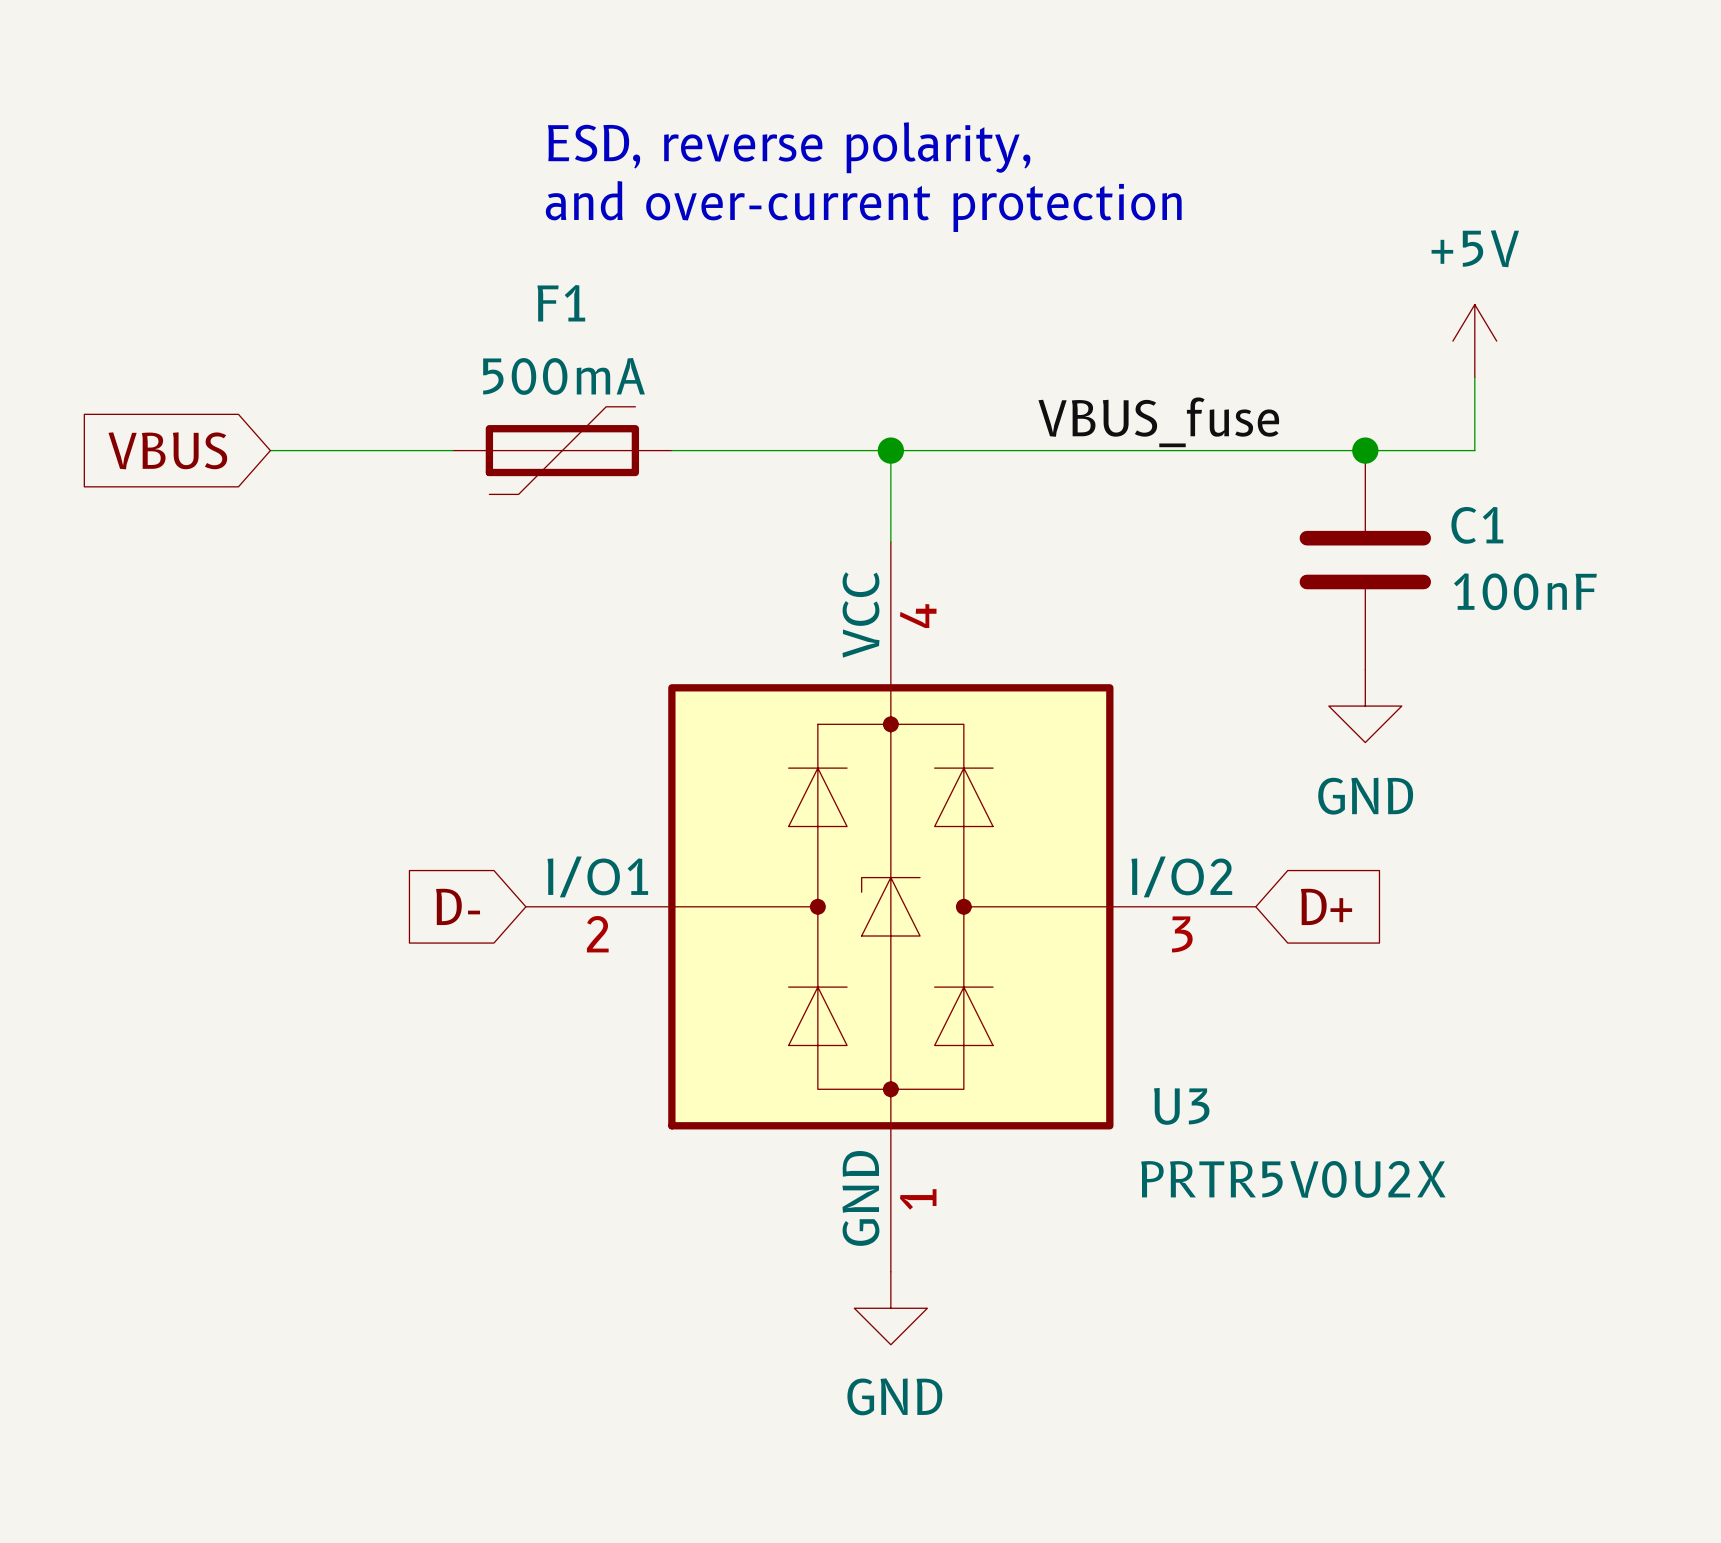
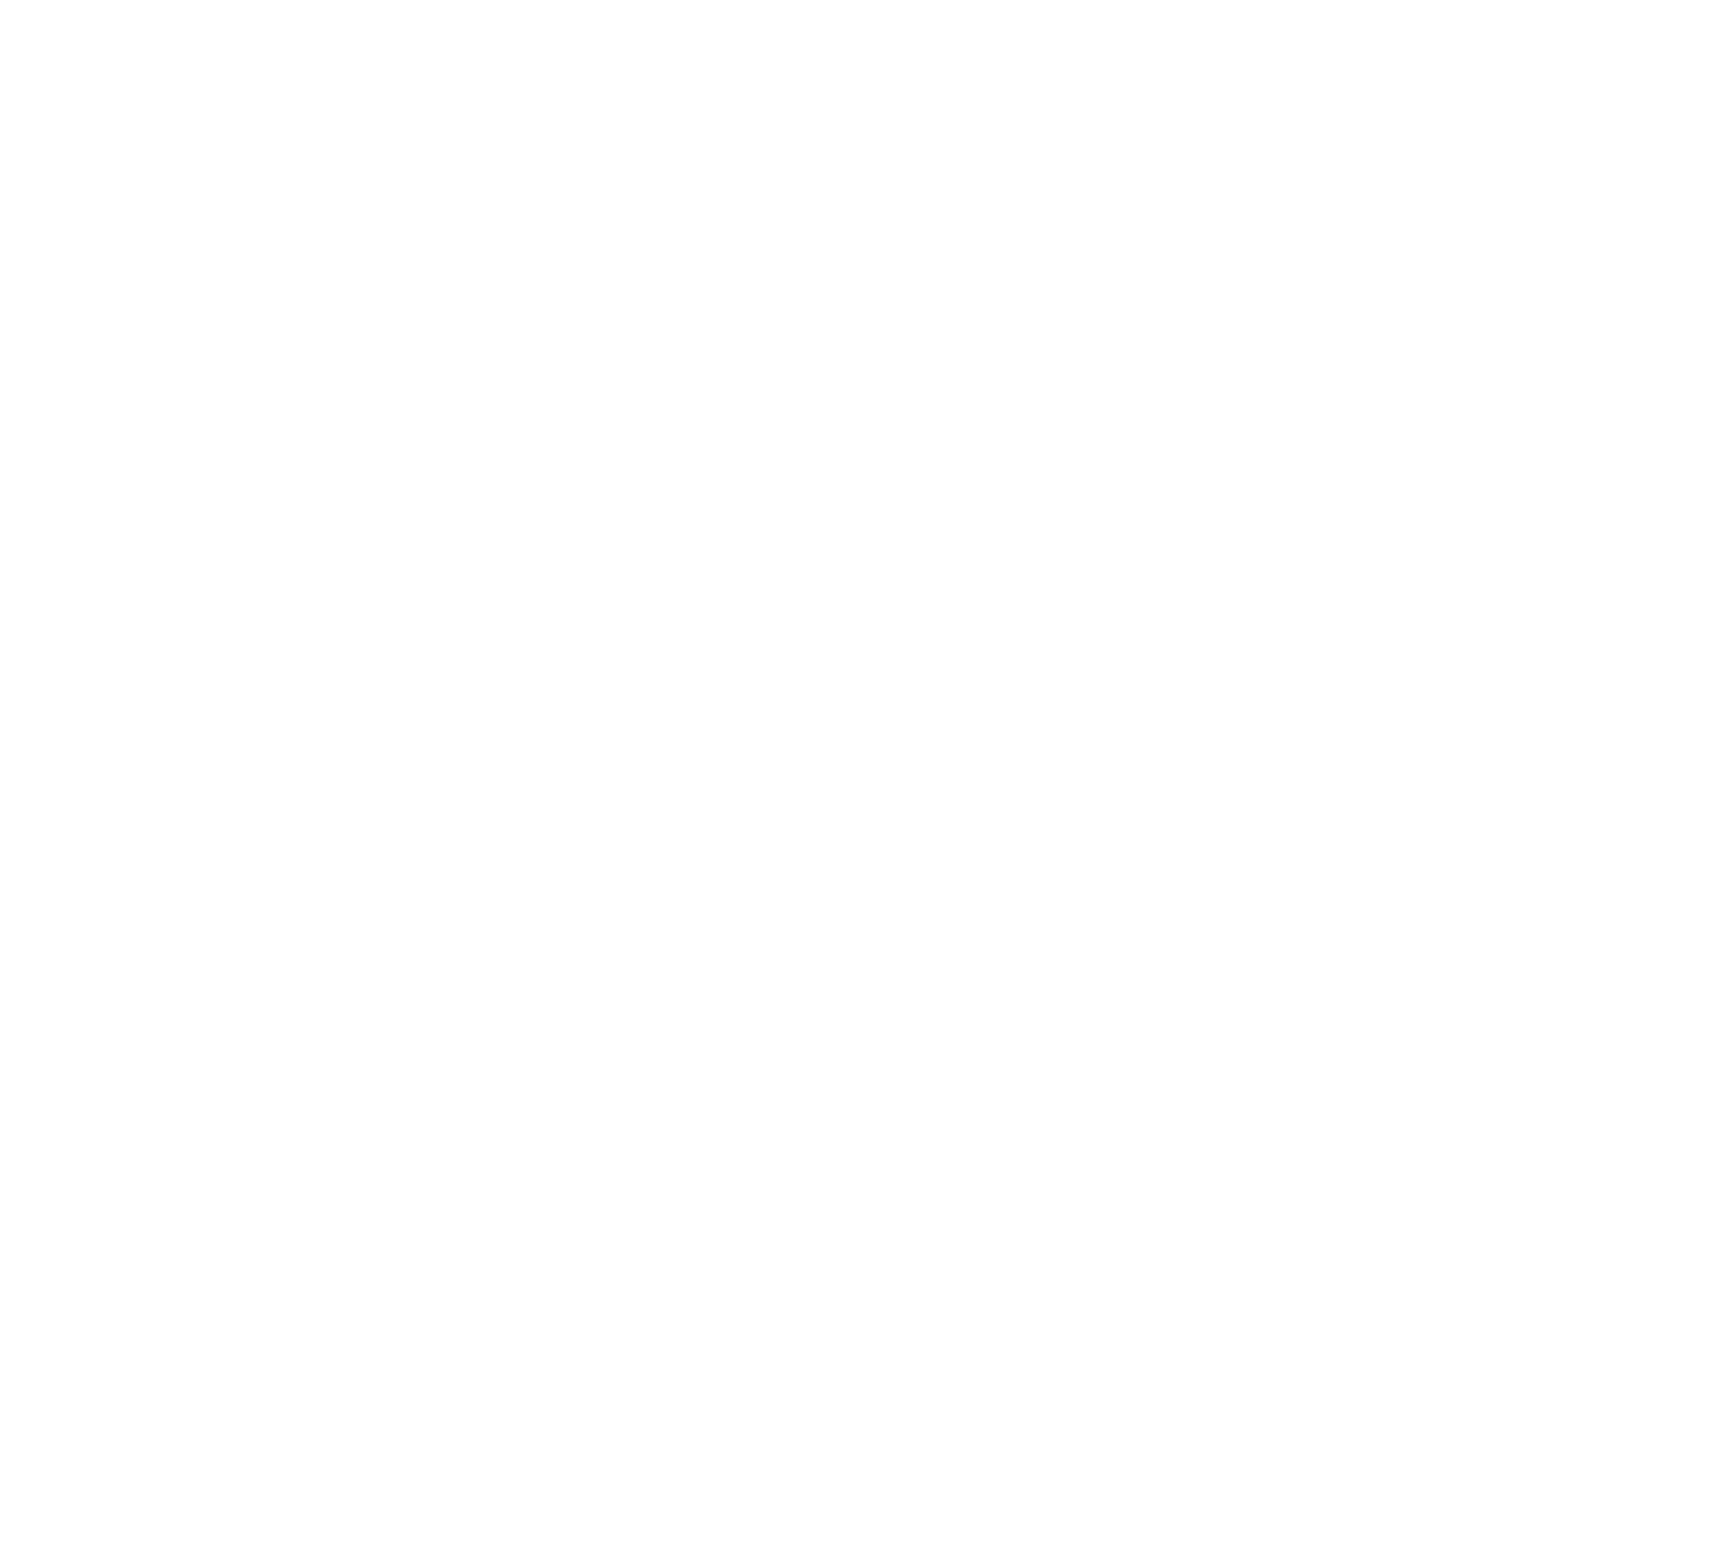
text: ESD, reverse polarity, (789, 147) -> none
text: and over-current protection (863, 206) -> none
power symbol: +5V (1474, 341) -> none
wire: (1474, 377) (1474, 450) (671, 450) -> none
label: VBUS_fuse (1158, 422) -> none
global label: VBUS (167, 450) -> none
wire: (270, 450) (452, 450) -> none
F1: 500mA (562, 450) -> none
wire: (890, 450) (890, 541) -> none
junction: (890, 450) -> none
junction: (1365, 450) -> none
C1: 100nF (1365, 560) -> none
power symbol: GND (1365, 706) -> none
global label: D- (458, 906) -> none
U3: PRTR5V0U2X (890, 906) -> none
global label: D+ (1326, 906) -> none
power symbol: GND (890, 1308) -> none

